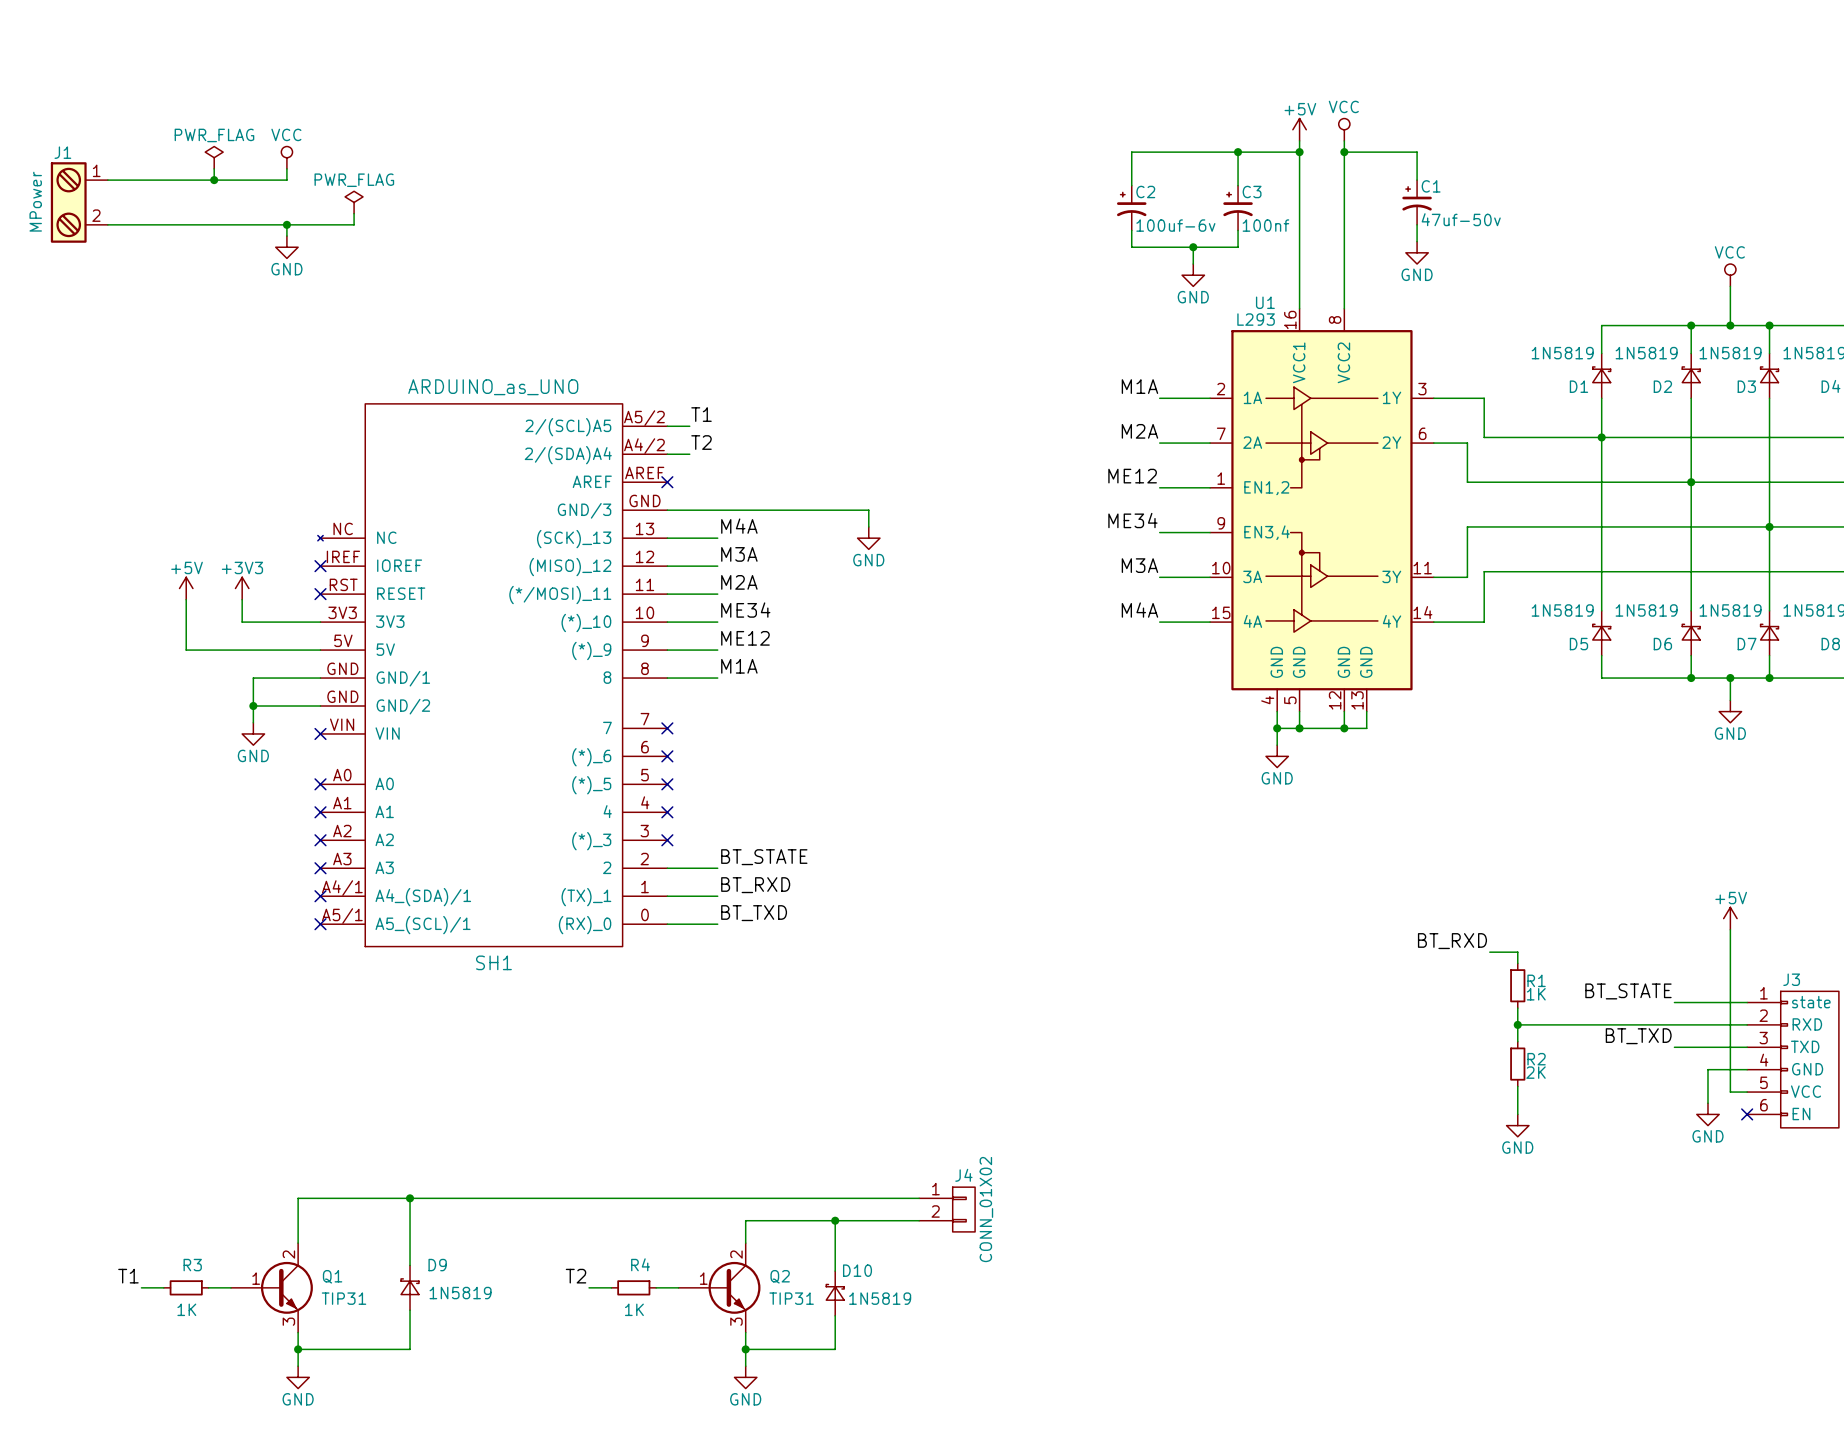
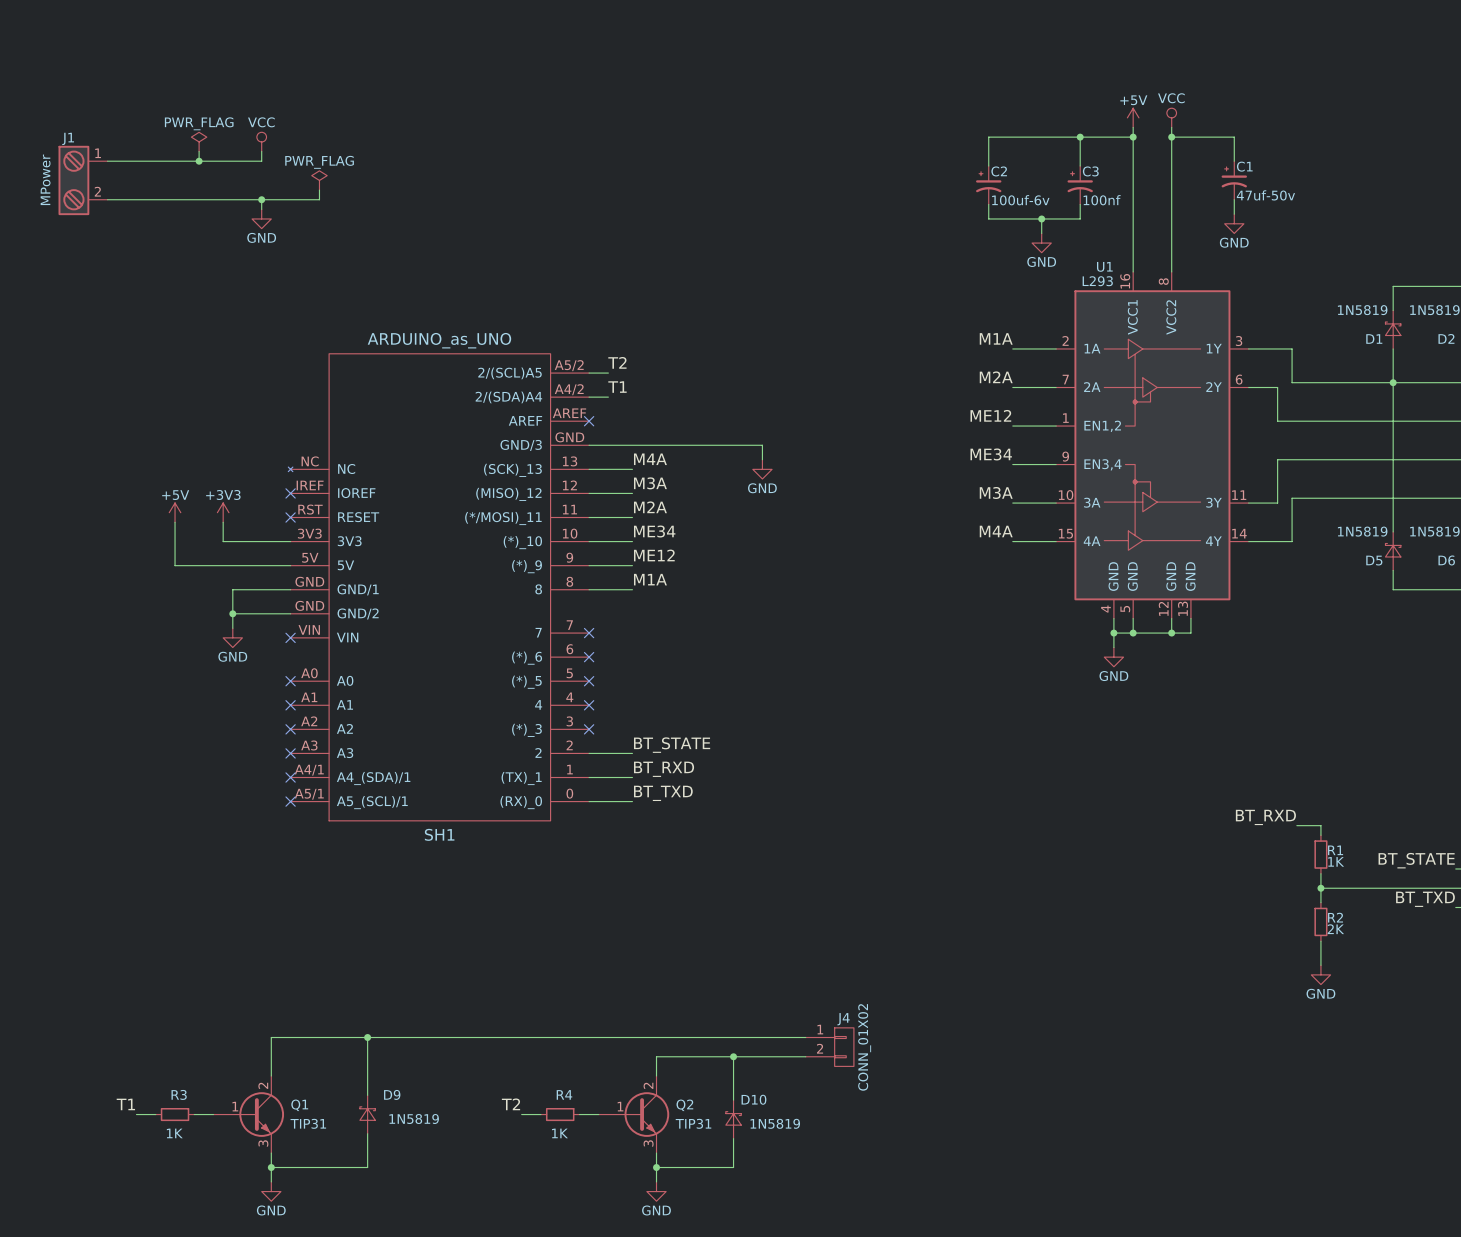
label: T1 (701, 414) -> T2 (617, 362)
label: T2 (701, 442) -> T1 (617, 387)

